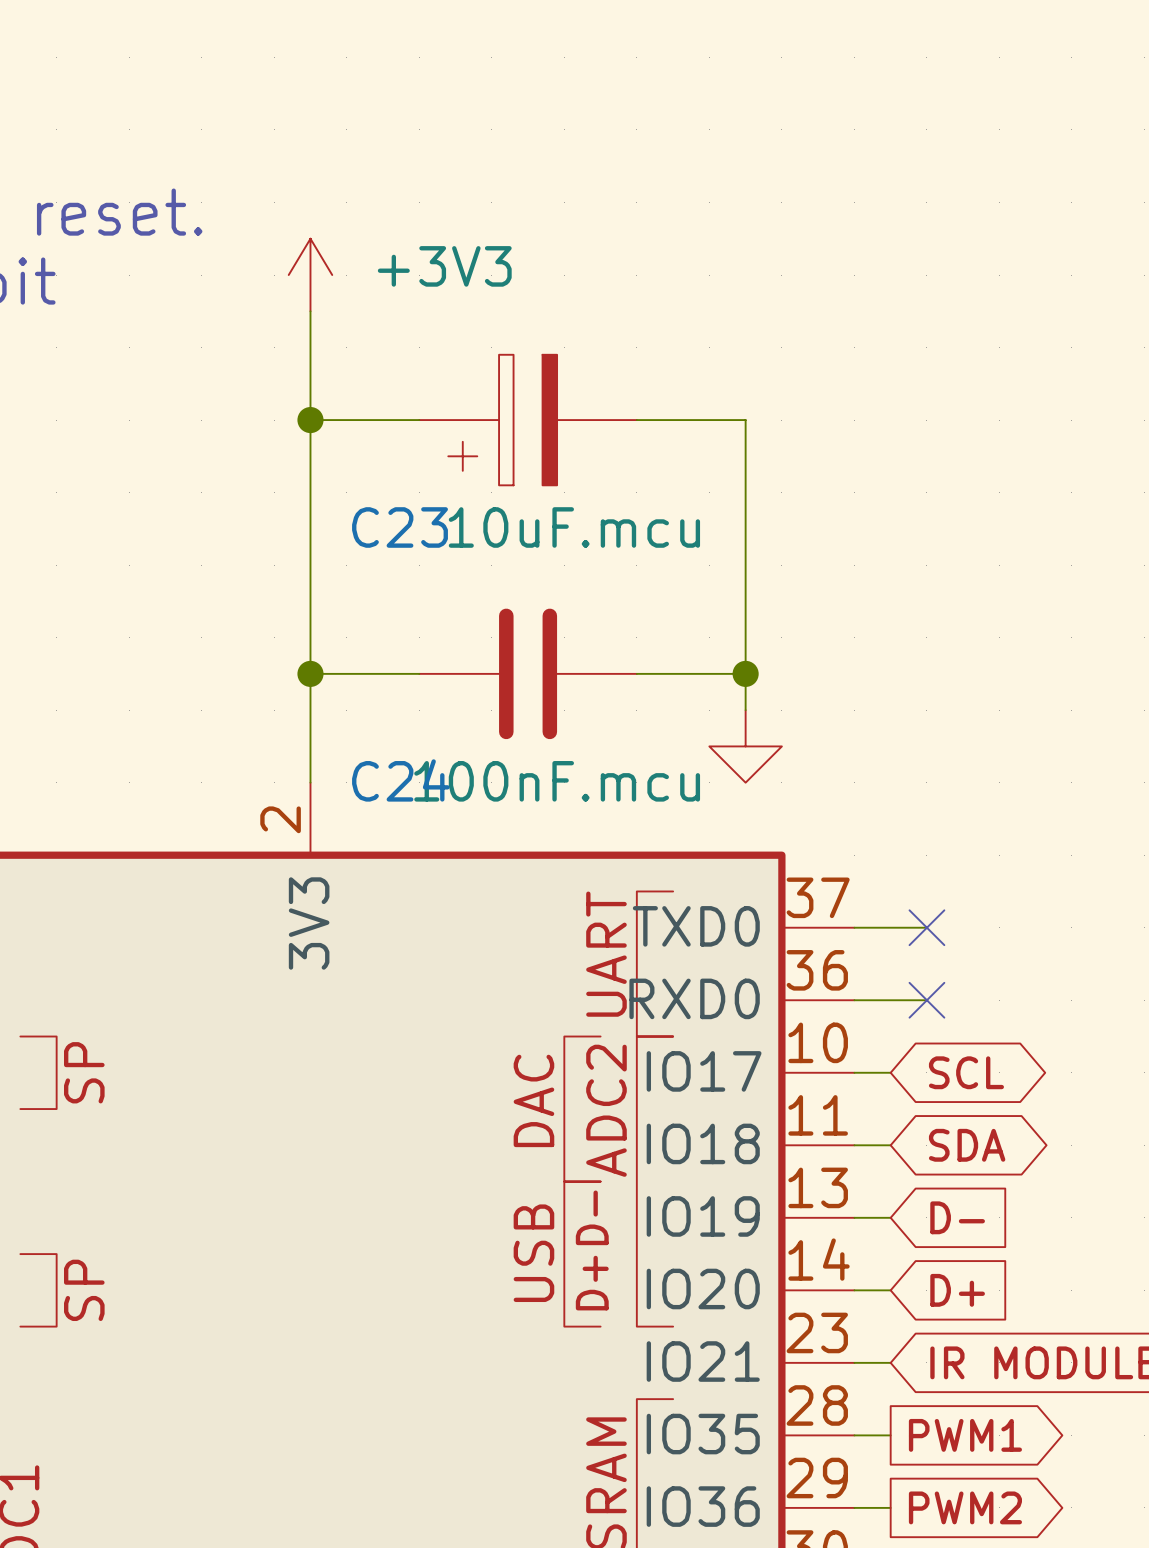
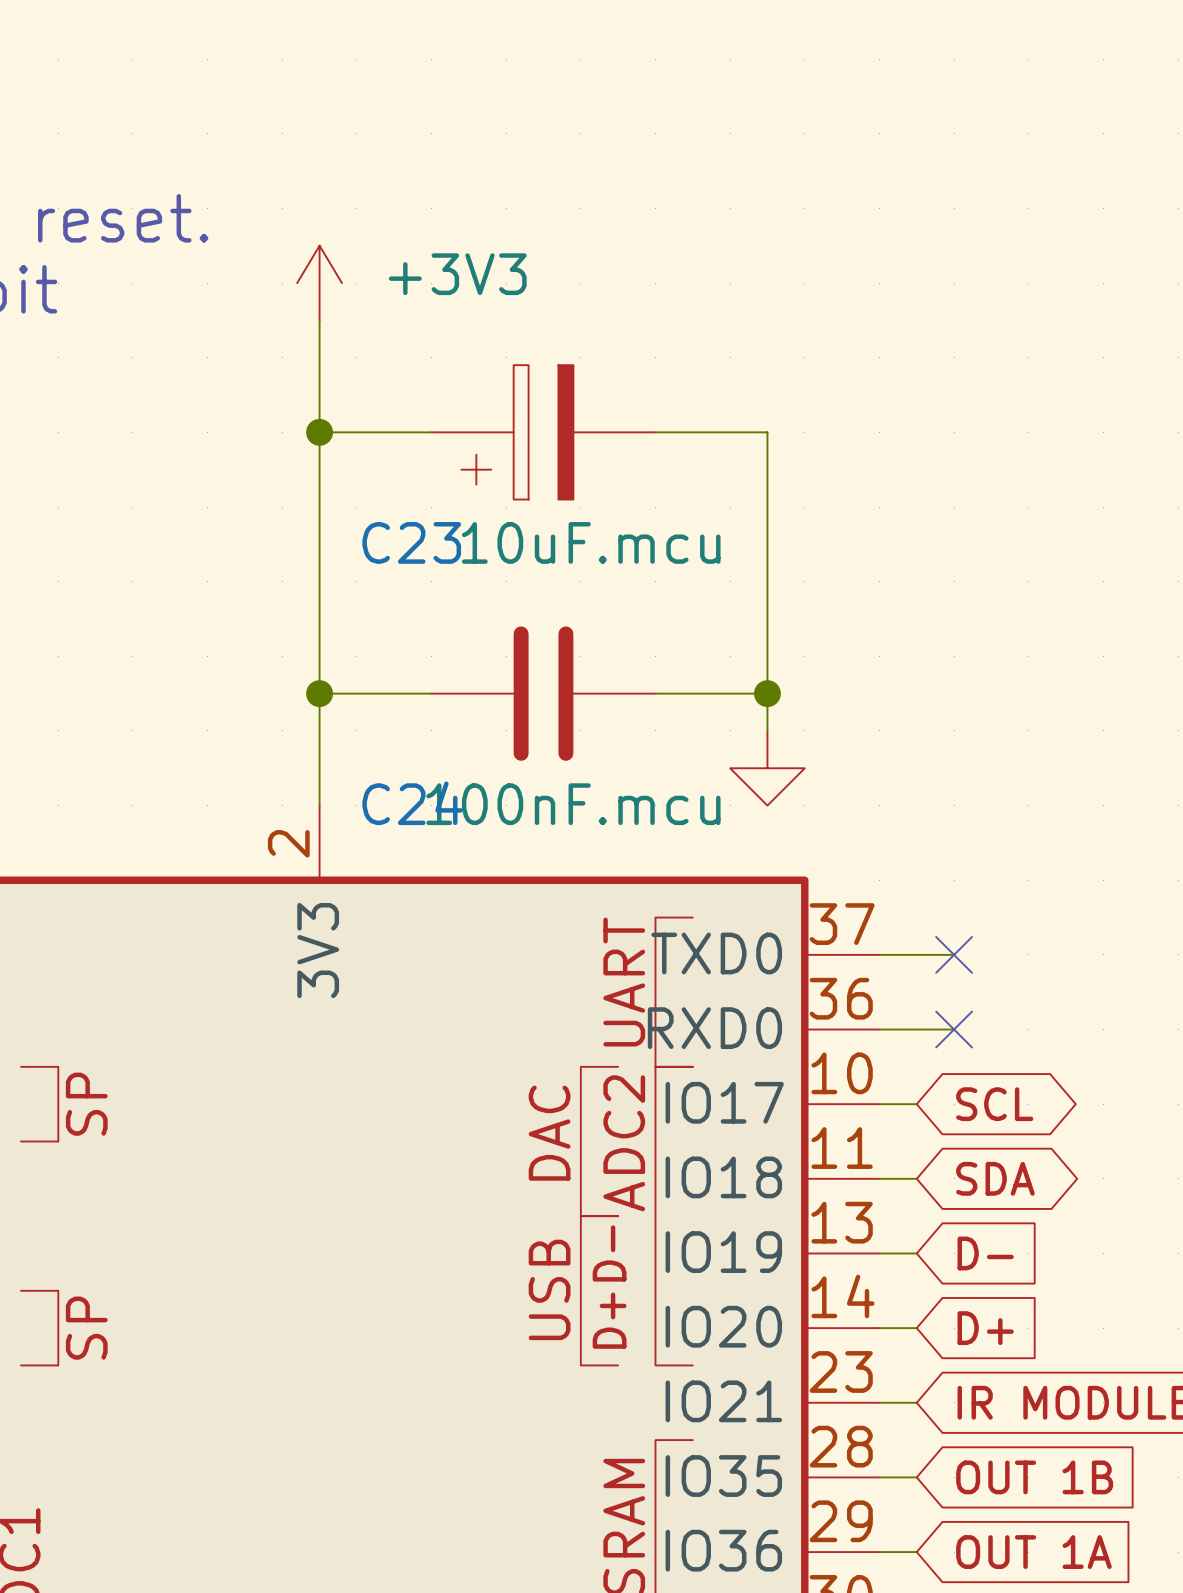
global label shape: output (965, 1435) -> input (1034, 1477)
global label: PWM1 (965, 1435) -> OUT 1B (1034, 1477)
global label shape: output (965, 1507) -> input (1033, 1552)
global label: PWM2 (965, 1507) -> OUT 1A (1033, 1552)

